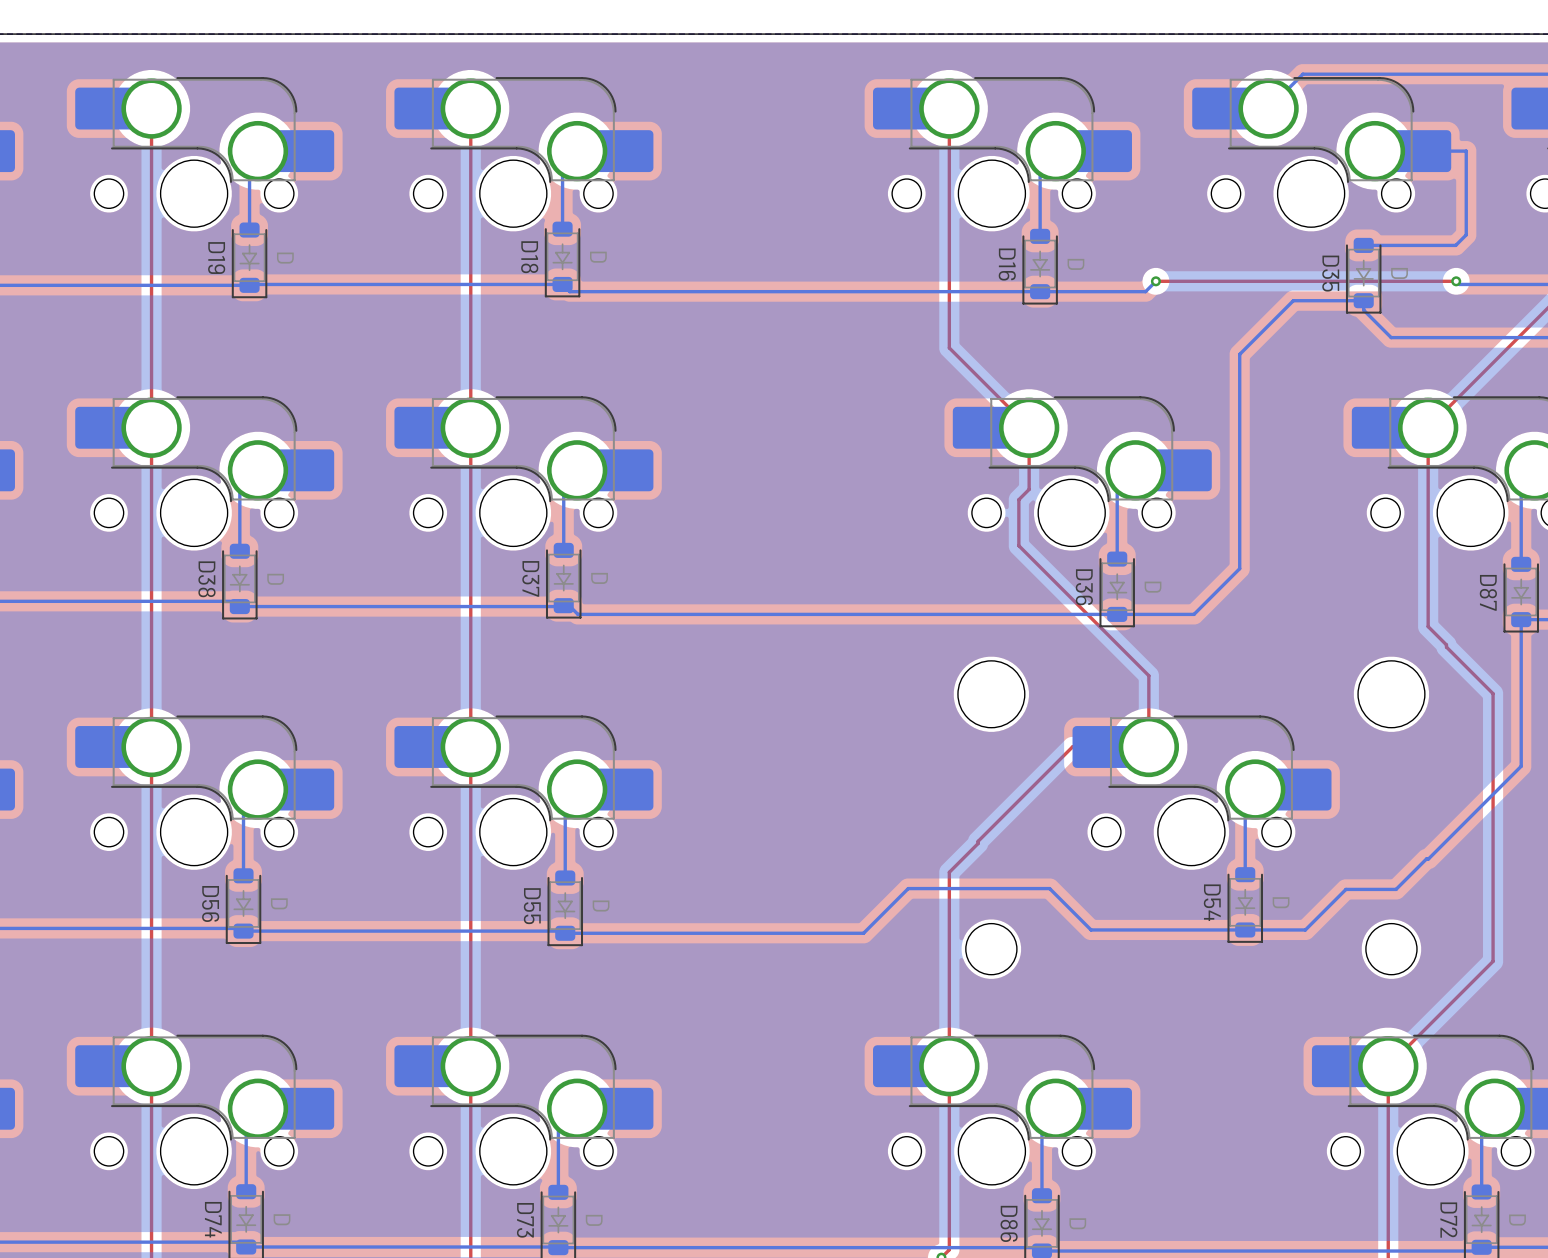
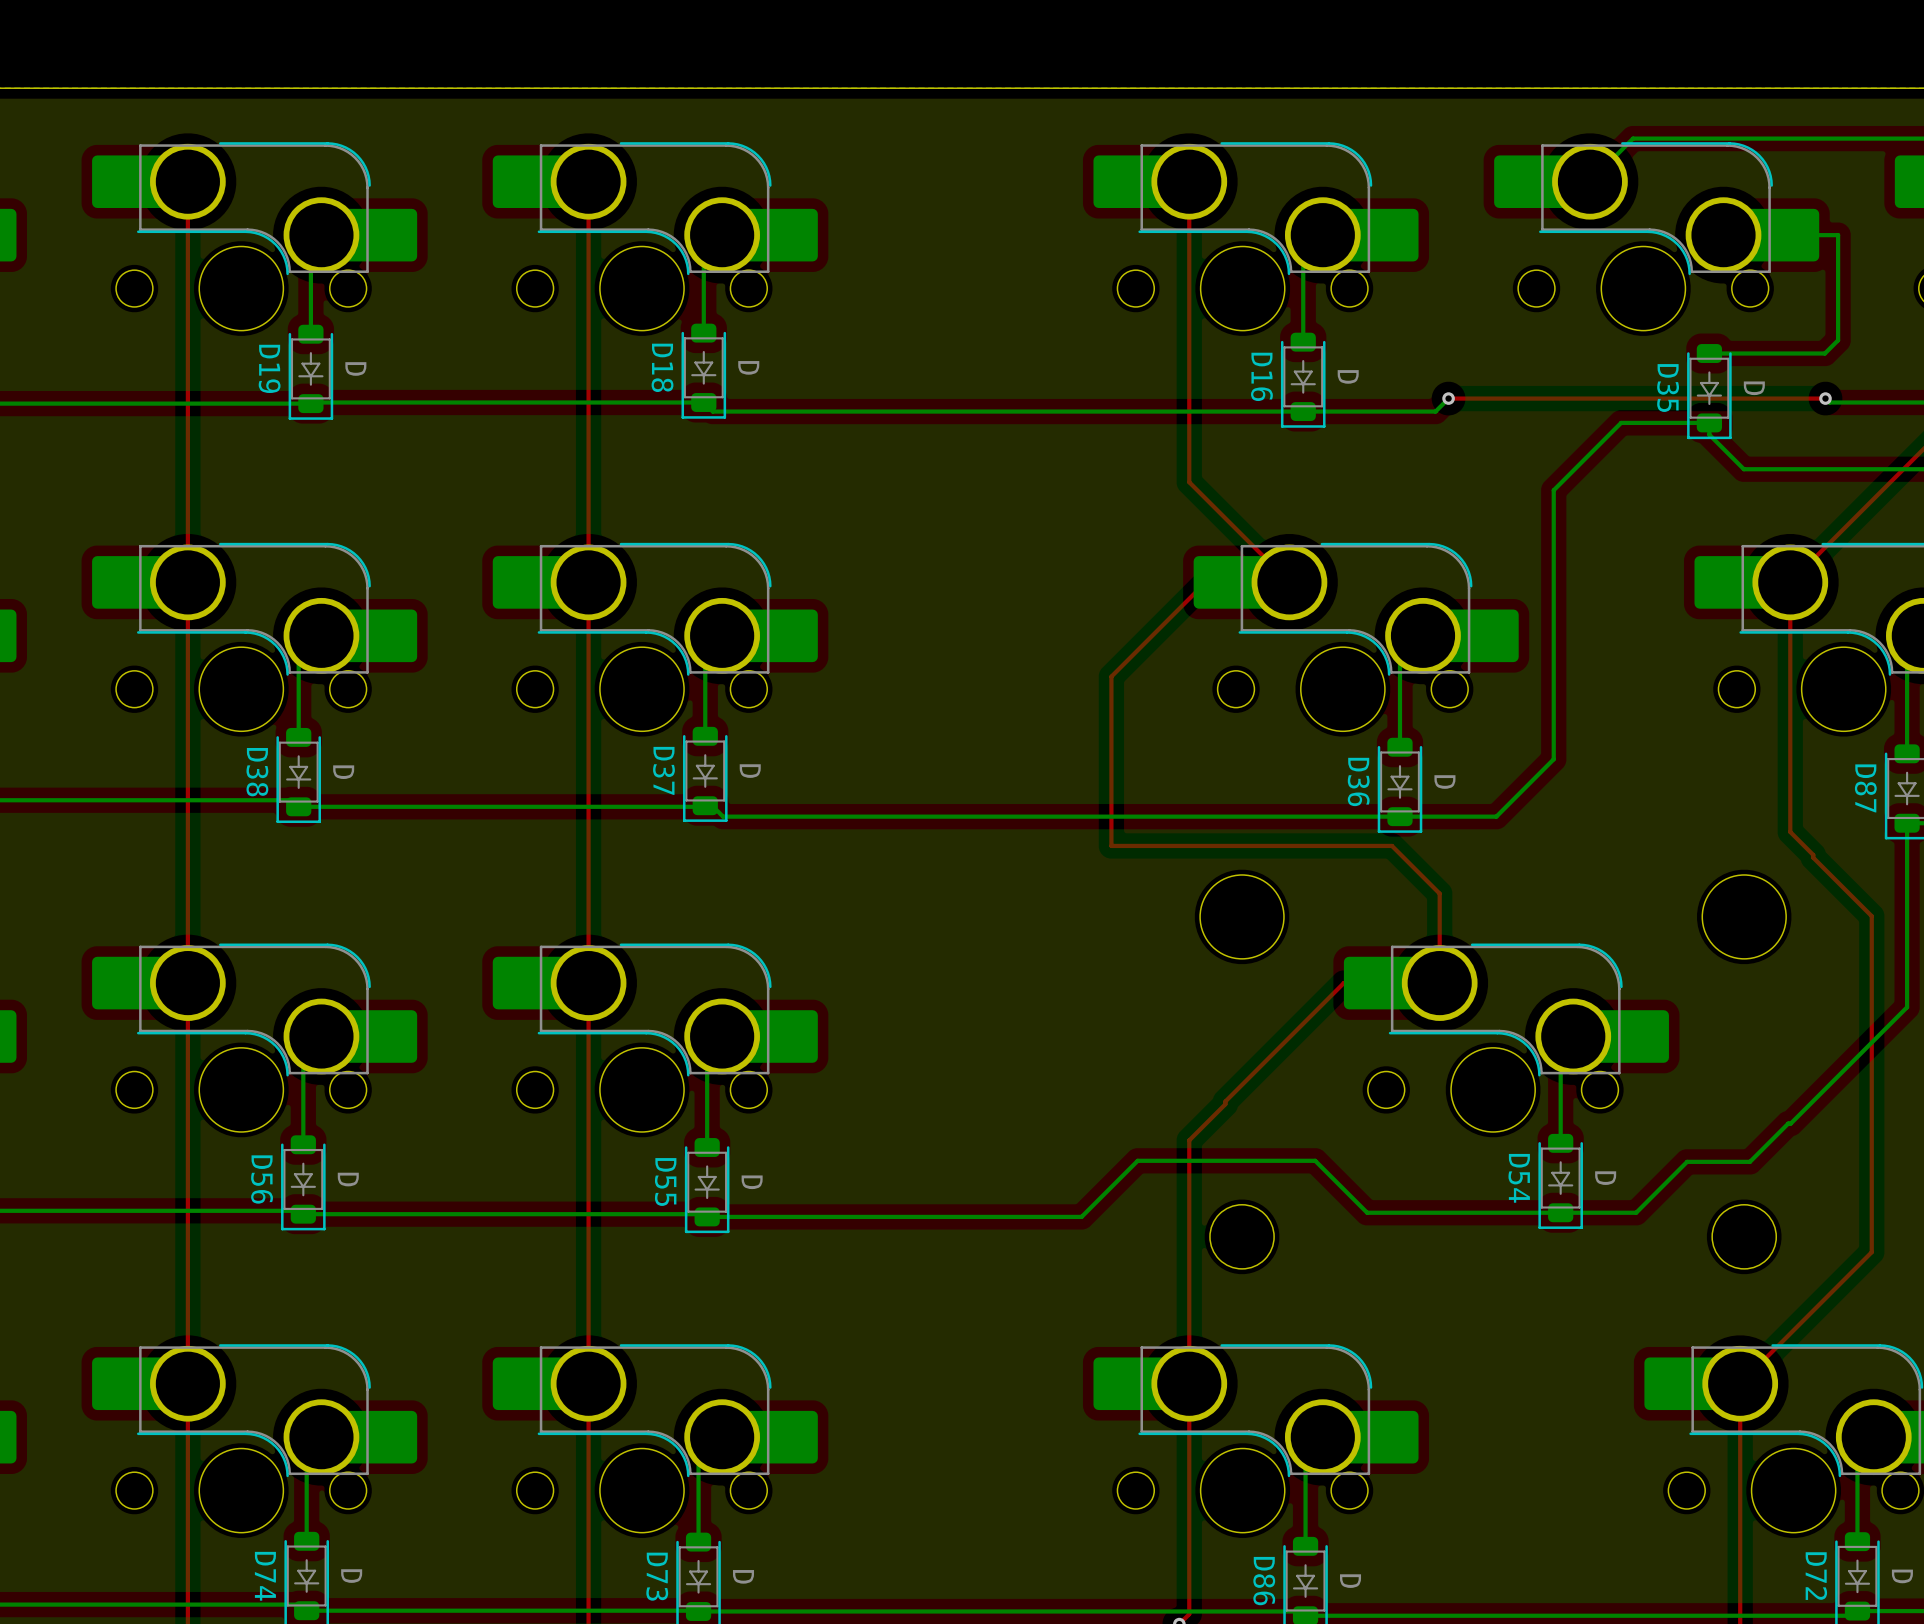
top track: (1029, 427) (1029, 489) (1018, 499) (1018, 545) (1110, 637) -> (1289, 582) (1205, 582) (1111, 676) (1111, 845) (1392, 845)

